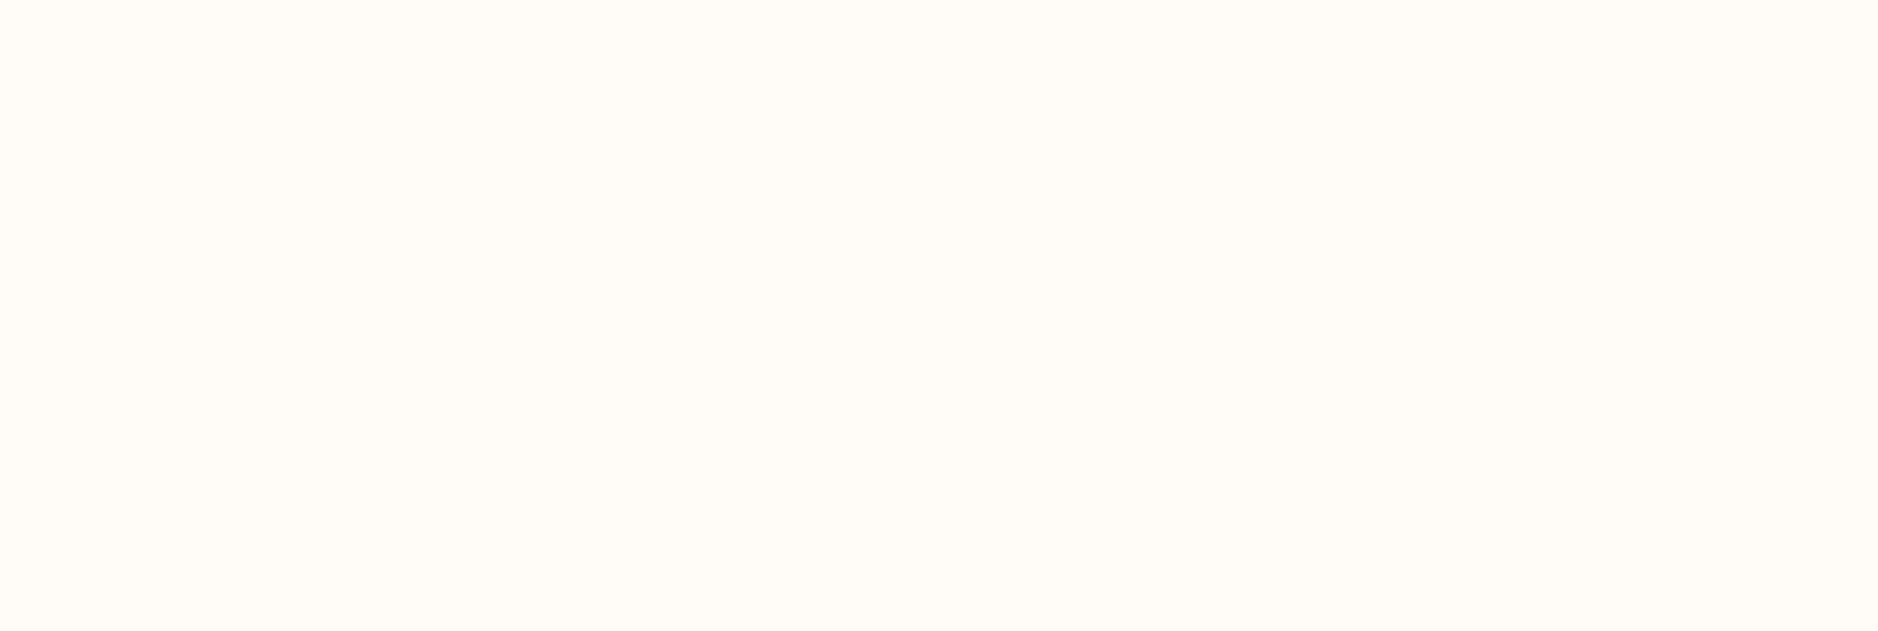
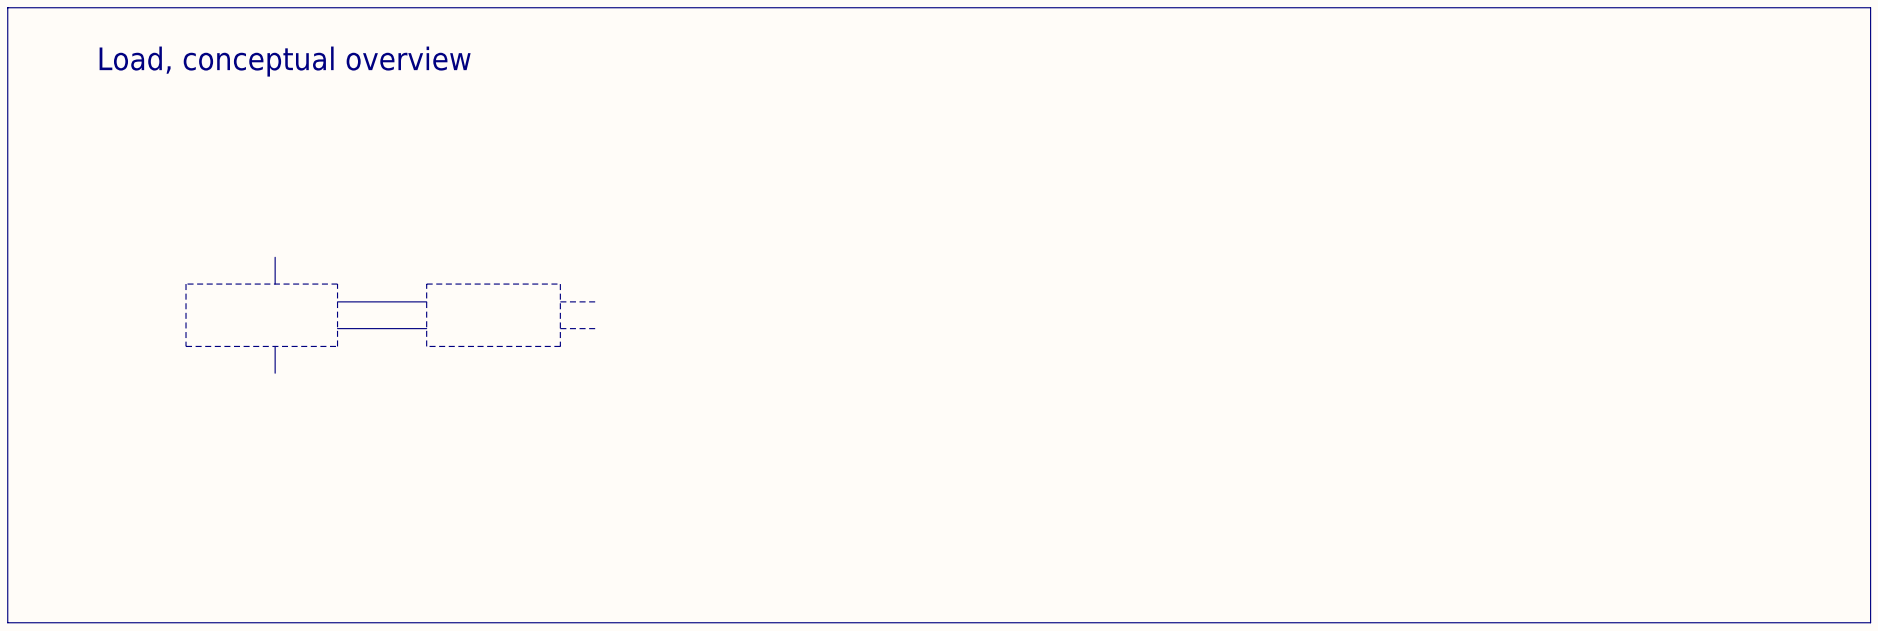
line: none -> (7, 7) (1870, 7) (1870, 622) (7, 622) (7, 7)
text: none -> Load, conceptual overview (285, 61)
wire: none -> (275, 257) (275, 284)
line: none -> (186, 284) (337, 284) (337, 346) (186, 346) (186, 284)
line: none -> (426, 284) (560, 284) (560, 346) (426, 346) (426, 284)
wire: none -> (337, 301) (426, 301)
wire: none -> (560, 301) (596, 301)
wire: none -> (337, 328) (426, 328)
wire: none -> (560, 328) (596, 328)
wire: none -> (275, 346) (275, 373)

